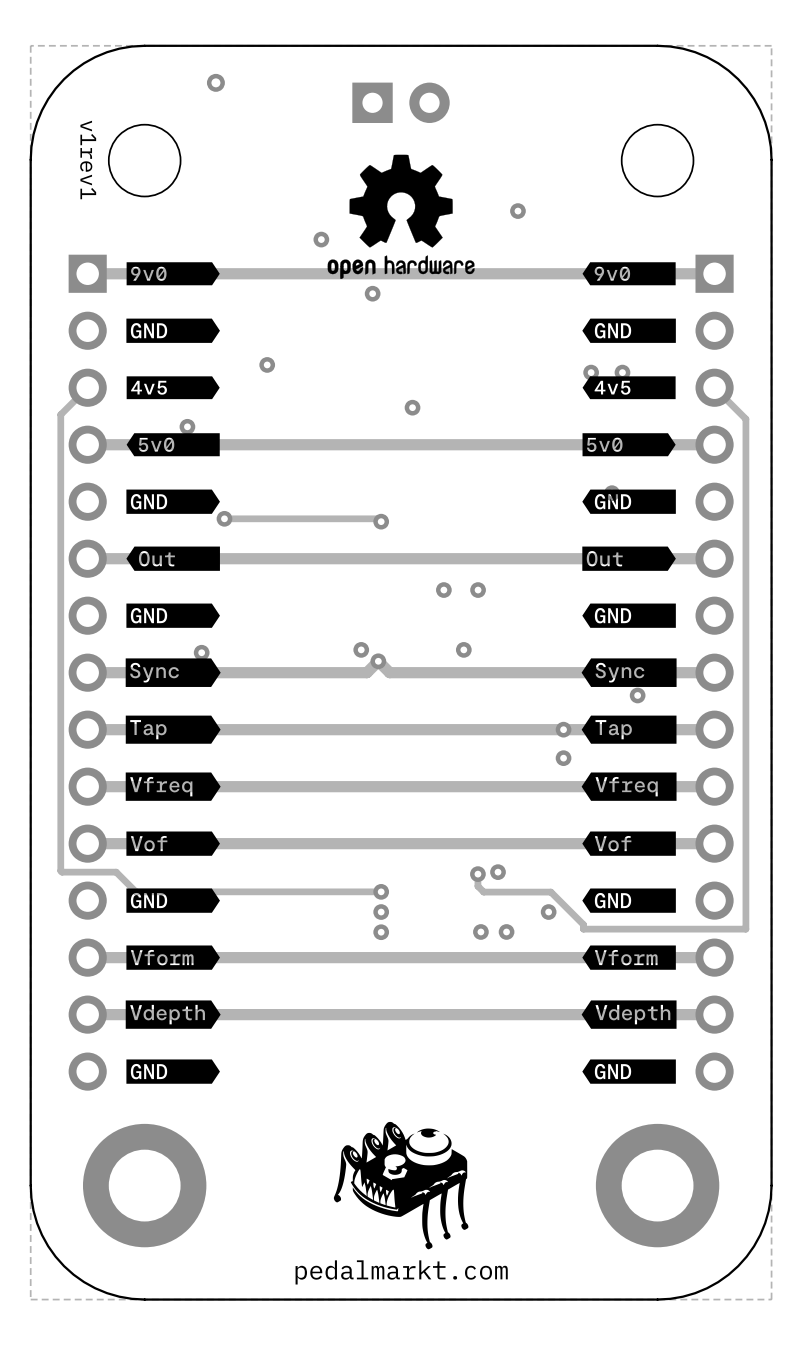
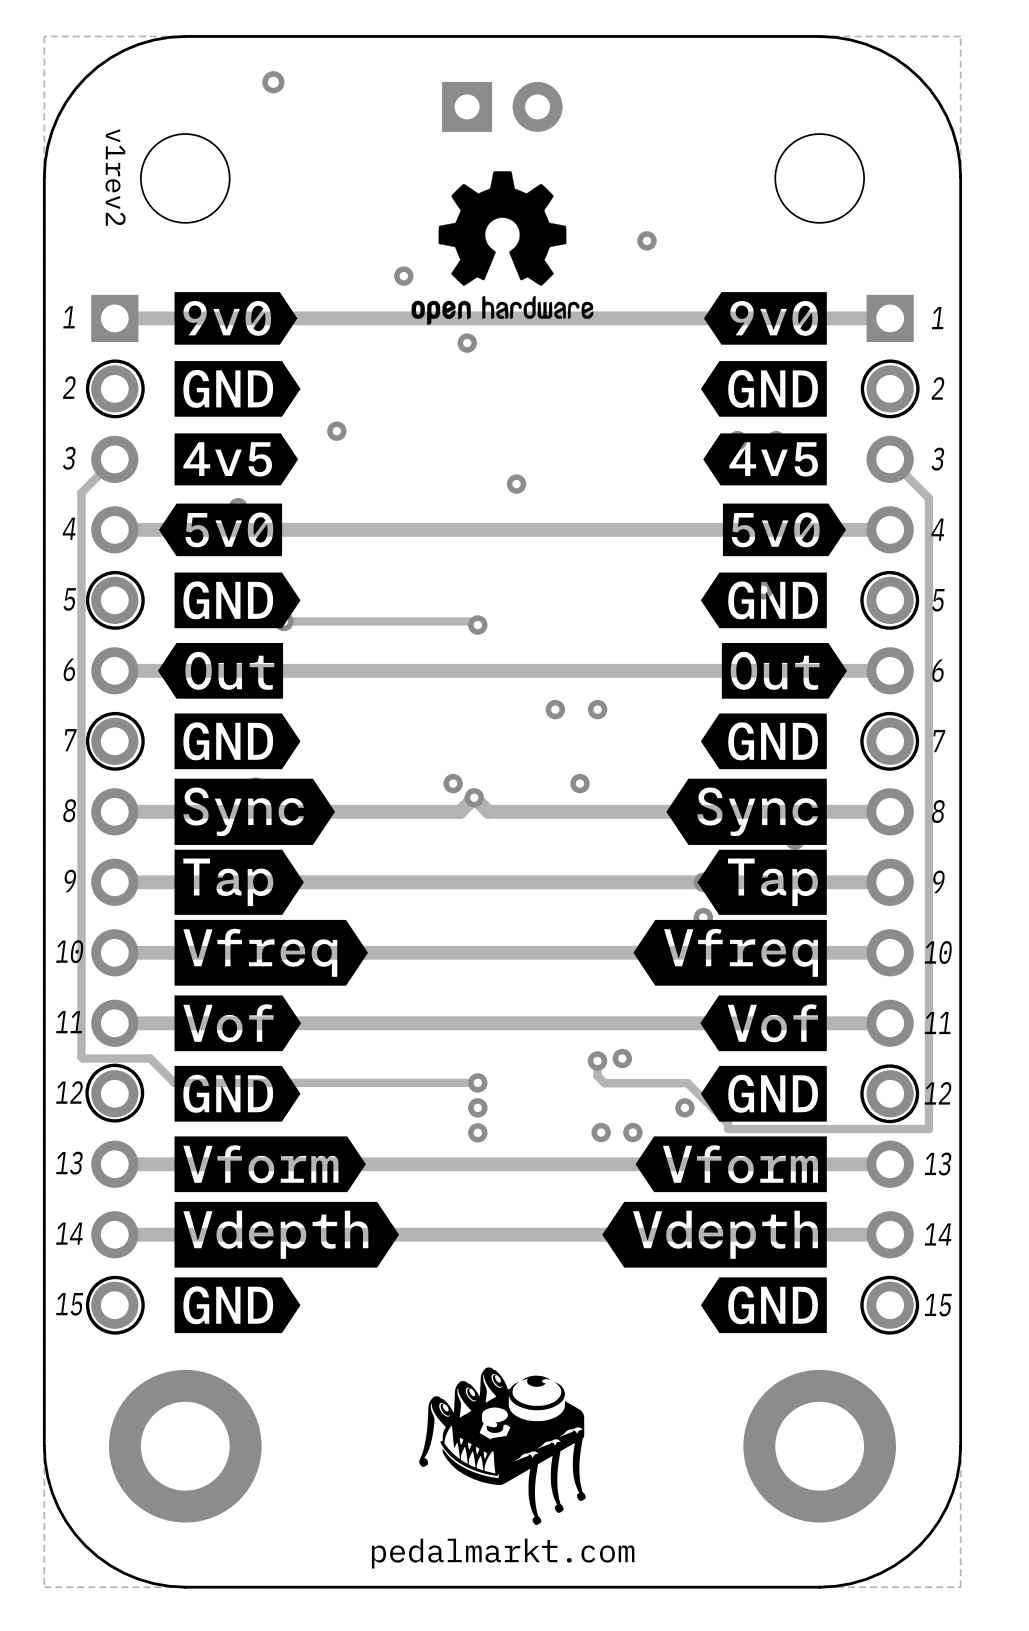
text: v1rev1 (88, 159) -> v1rev2 (115, 177)
drawing shape: [126, 262, 220, 286] -> [174, 292, 298, 345]
drawing shape: [582, 262, 676, 286] -> [703, 292, 827, 345]
text: none -> 1 (69, 317)
text: none -> 1 (937, 318)
drawing: none -> [85, 359, 145, 419]
drawing: none -> [860, 359, 920, 419]
drawing shape: [126, 318, 220, 343] -> [174, 361, 301, 417]
drawing shape: [582, 318, 676, 343] -> [700, 361, 827, 417]
text: none -> 2 (69, 387)
text: none -> 2 (937, 388)
drawing shape: [126, 376, 220, 400] -> [174, 433, 299, 486]
drawing shape: [582, 376, 676, 400] -> [703, 433, 827, 486]
text: none -> 3 (69, 458)
text: none -> 3 (937, 459)
drawing shape: [126, 433, 220, 457] -> [159, 503, 283, 557]
drawing shape: [582, 433, 676, 457] -> [722, 503, 846, 557]
text: none -> 4 (69, 528)
text: none -> 4 (937, 529)
drawing: none -> [85, 570, 145, 630]
drawing: none -> [860, 570, 920, 630]
drawing shape: [126, 489, 220, 514] -> [174, 572, 301, 629]
drawing shape: [582, 489, 676, 514] -> [700, 572, 827, 629]
text: none -> 5 (69, 599)
text: none -> 5 (938, 600)
drawing shape: [126, 546, 220, 571] -> [157, 643, 284, 699]
drawing shape: [582, 546, 676, 571] -> [721, 643, 847, 699]
text: none -> 6 (69, 669)
text: none -> 6 (937, 670)
drawing: none -> [85, 711, 336, 845]
drawing: none -> [860, 711, 920, 771]
drawing shape: [126, 603, 220, 628] -> [174, 713, 301, 770]
drawing shape: [582, 603, 676, 628] -> [700, 713, 827, 770]
text: none -> 7 (70, 740)
text: none -> 7 (939, 741)
drawing: none -> [666, 778, 827, 845]
drawing: [125, 658, 221, 687] -> none
drawing: [581, 658, 677, 687] -> none
text: none -> 8 (69, 810)
text: none -> 8 (938, 811)
drawing shape: [125, 715, 221, 744] -> [174, 849, 304, 915]
drawing shape: [581, 715, 677, 744] -> [697, 849, 827, 915]
text: none -> 9 (70, 881)
text: none -> 9 (938, 881)
drawing: none -> [174, 919, 368, 986]
drawing: none -> [633, 919, 827, 986]
drawing: [125, 772, 221, 801] -> none
drawing: [581, 772, 677, 801] -> none
text: none -> 10 (69, 951)
text: none -> 10 (938, 952)
drawing shape: [126, 831, 220, 856] -> [174, 995, 302, 1052]
drawing shape: [582, 831, 676, 856] -> [700, 995, 827, 1052]
text: none -> 11 (69, 1022)
text: none -> 11 (937, 1023)
drawing: none -> [85, 1063, 145, 1123]
drawing: none -> [860, 1064, 920, 1124]
drawing shape: [126, 888, 220, 913] -> [174, 1065, 301, 1122]
drawing shape: [582, 888, 676, 913] -> [700, 1065, 827, 1122]
text: none -> 12 (69, 1092)
text: none -> 12 (938, 1093)
drawing: none -> [85, 1136, 400, 1335]
drawing: none -> [602, 1136, 827, 1268]
drawing: [126, 945, 220, 970] -> none
drawing: [582, 945, 676, 970] -> none
text: none -> 13 (69, 1163)
text: none -> 13 (938, 1163)
drawing: [125, 1000, 221, 1029] -> none
drawing: [581, 1000, 677, 1029] -> none
text: none -> 14 (69, 1233)
text: none -> 14 (938, 1234)
drawing: none -> [860, 1275, 920, 1335]
drawing shape: [126, 1059, 220, 1084] -> [174, 1277, 301, 1334]
drawing shape: [582, 1059, 676, 1084] -> [700, 1277, 827, 1334]
text: none -> 15 (69, 1304)
text: none -> 15 (938, 1305)

